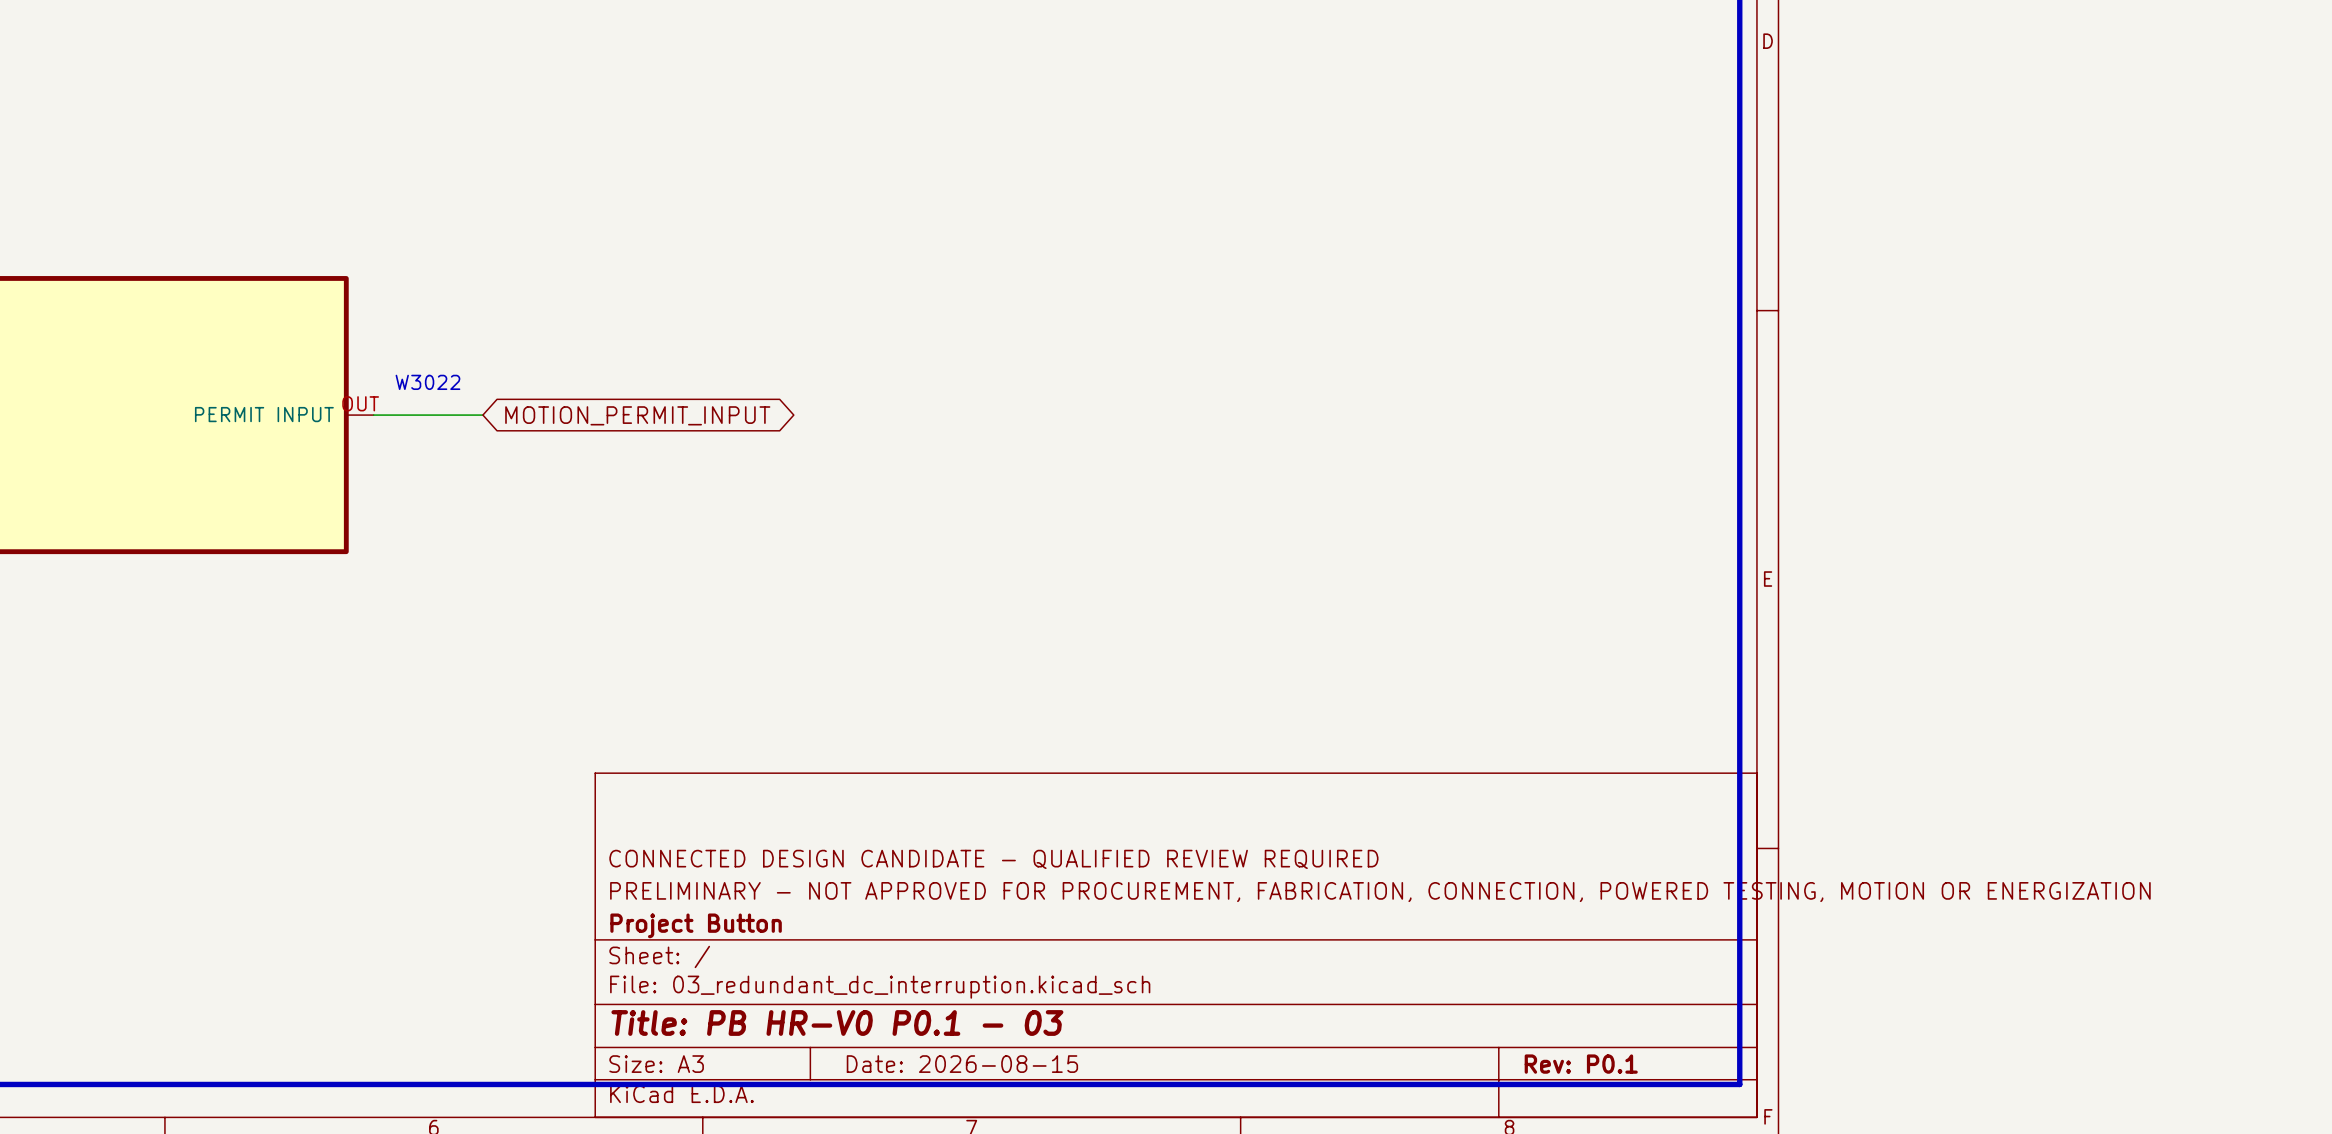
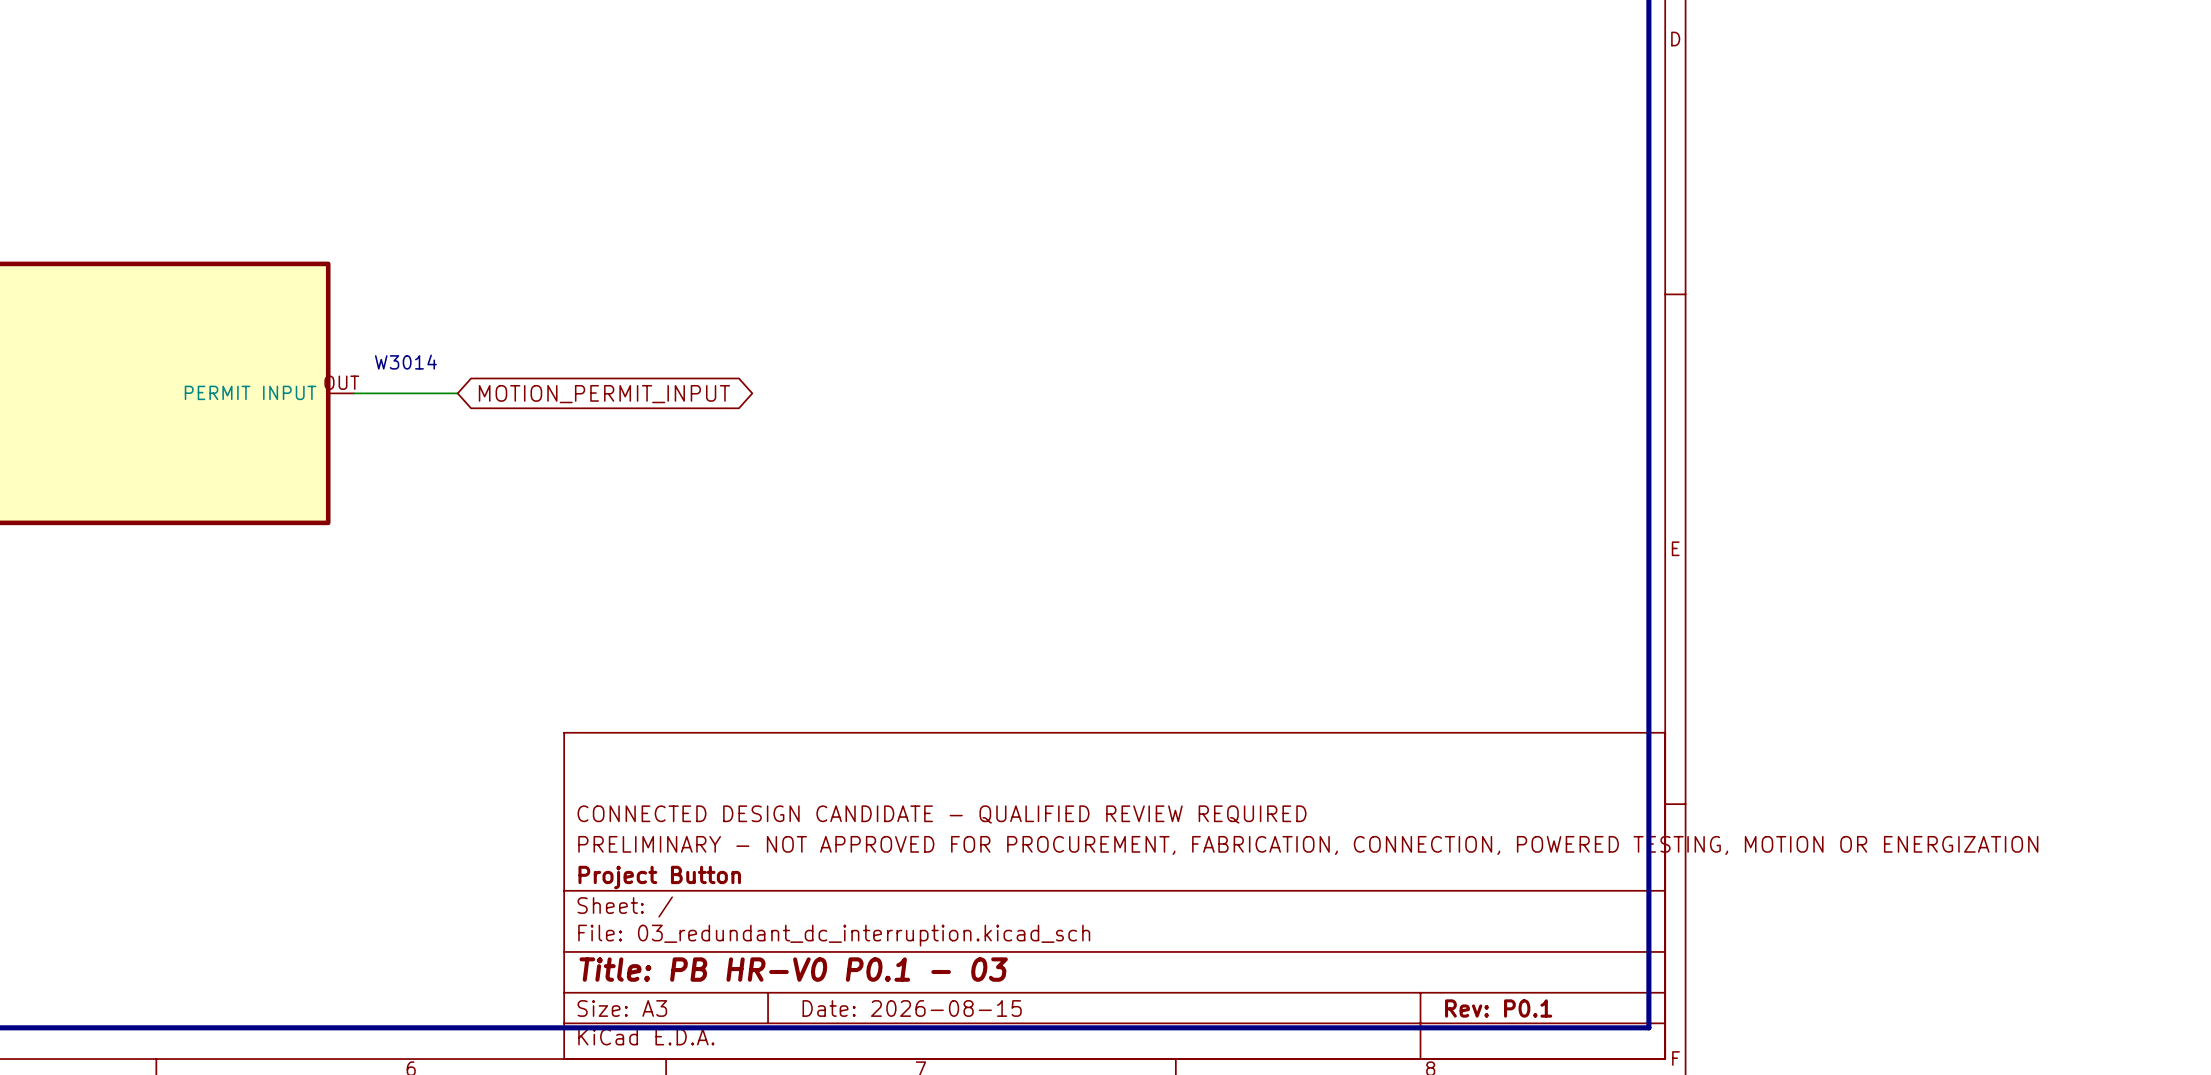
text: W3022 (427, 382) -> W3014 (405, 362)

